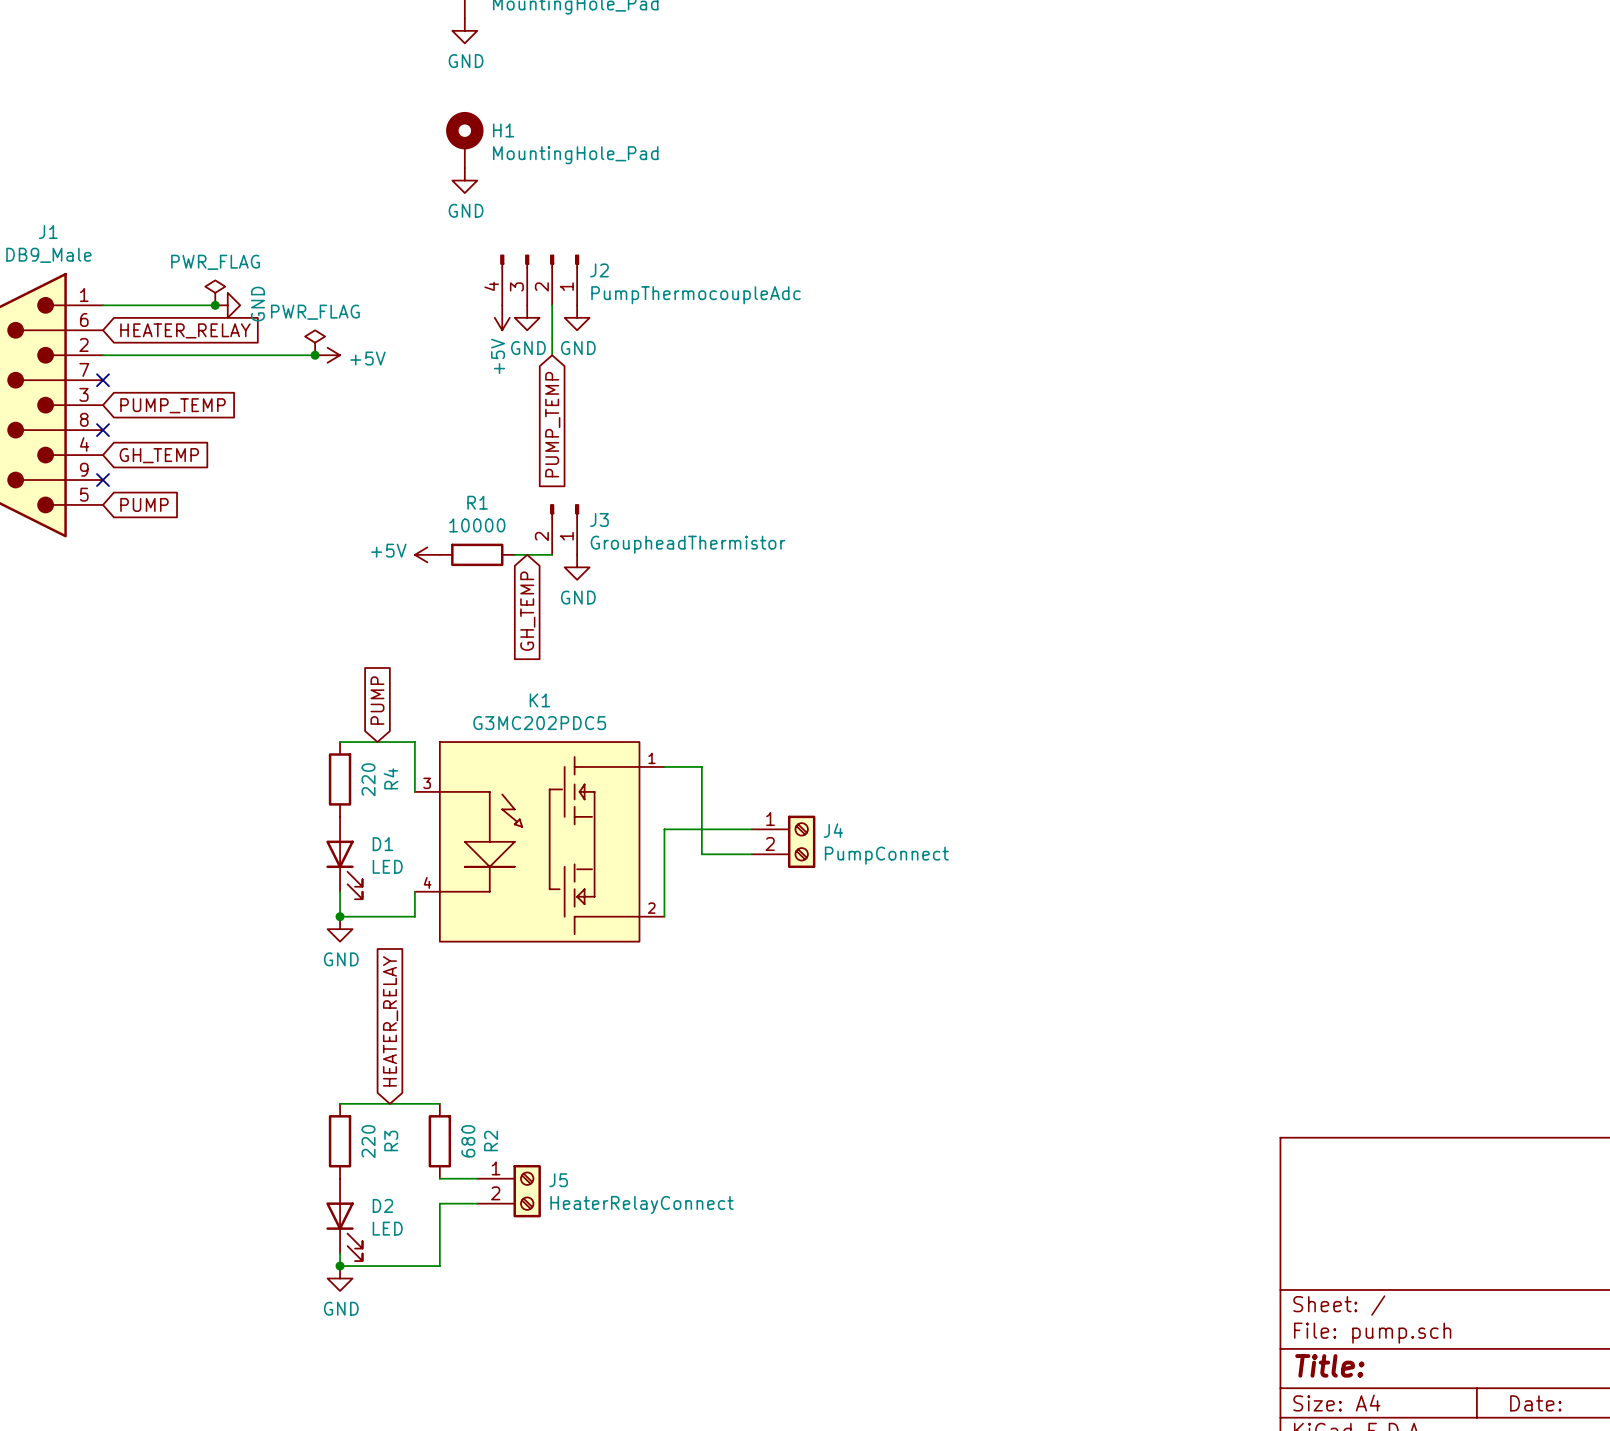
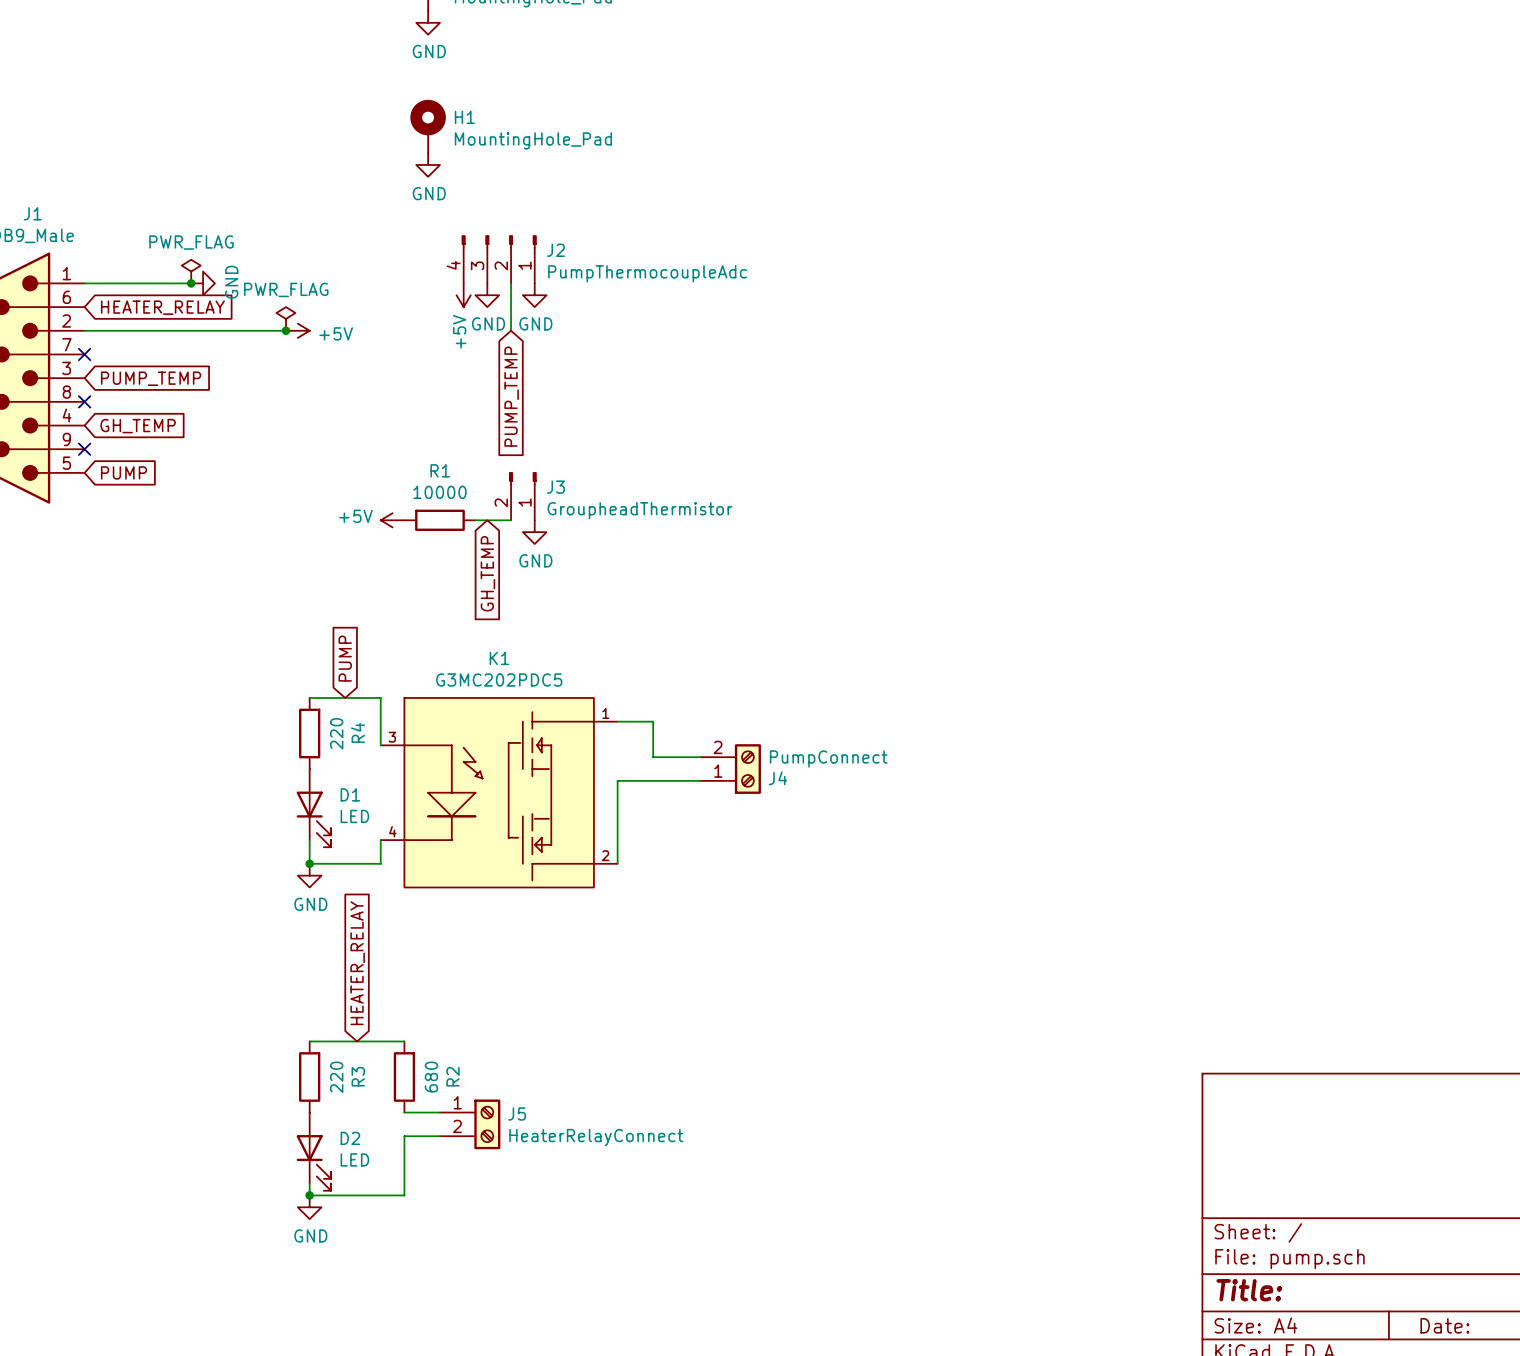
wire: (701, 804) (701, 854) (751, 854) -> (653, 757) (700, 757)
J4 flip: as is (801, 841) -> up-down (747, 769)

